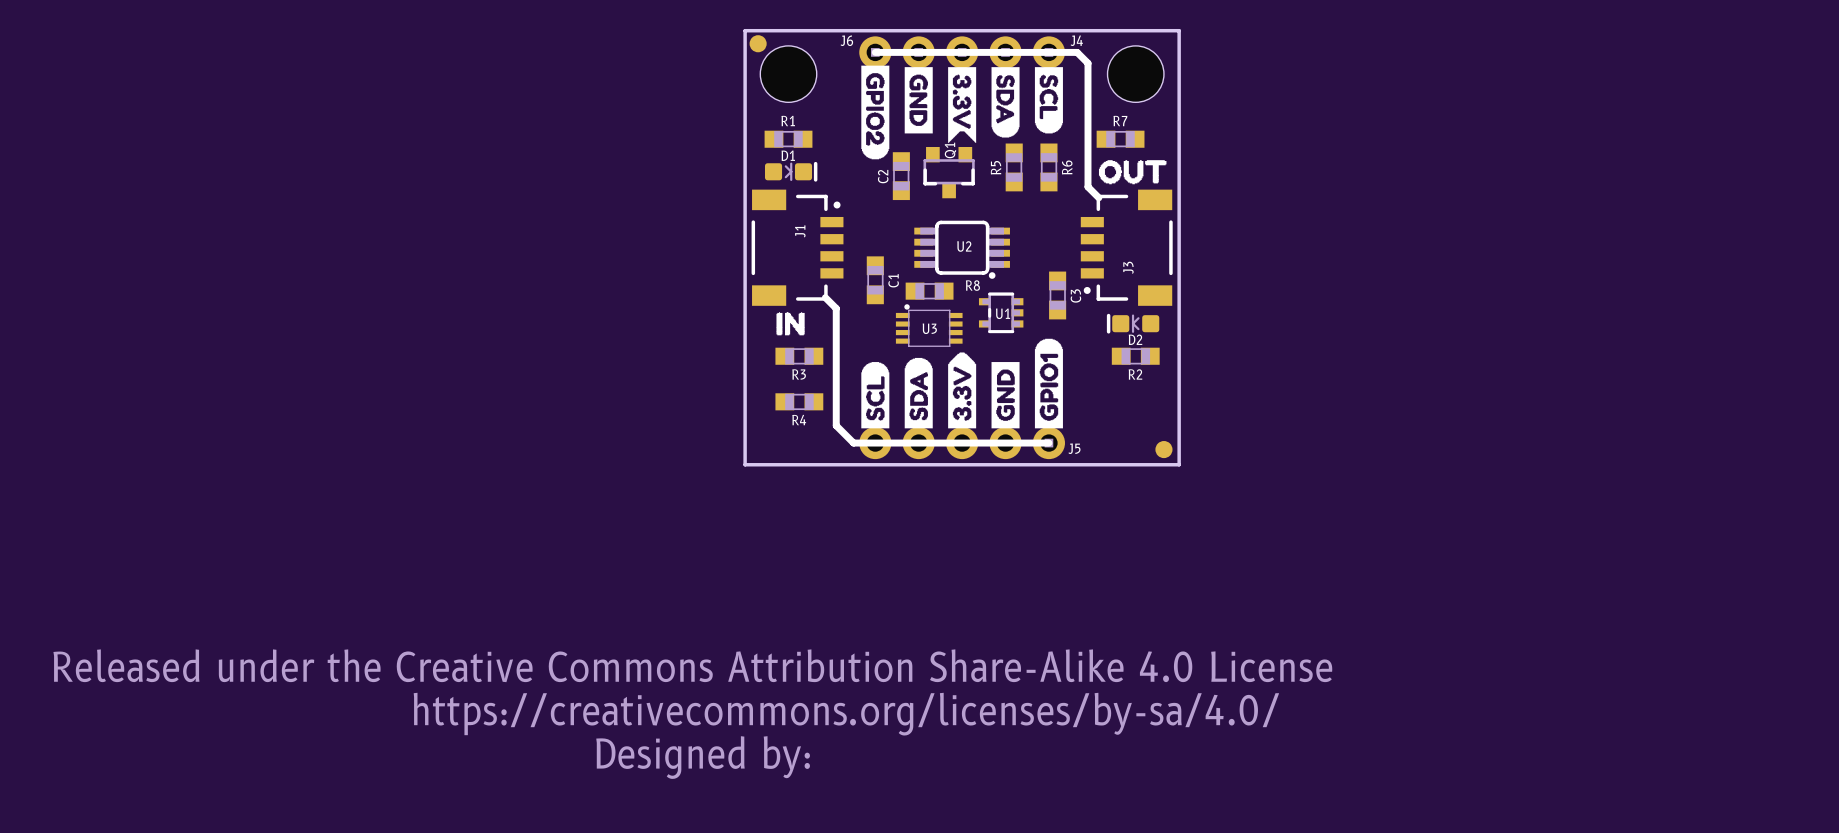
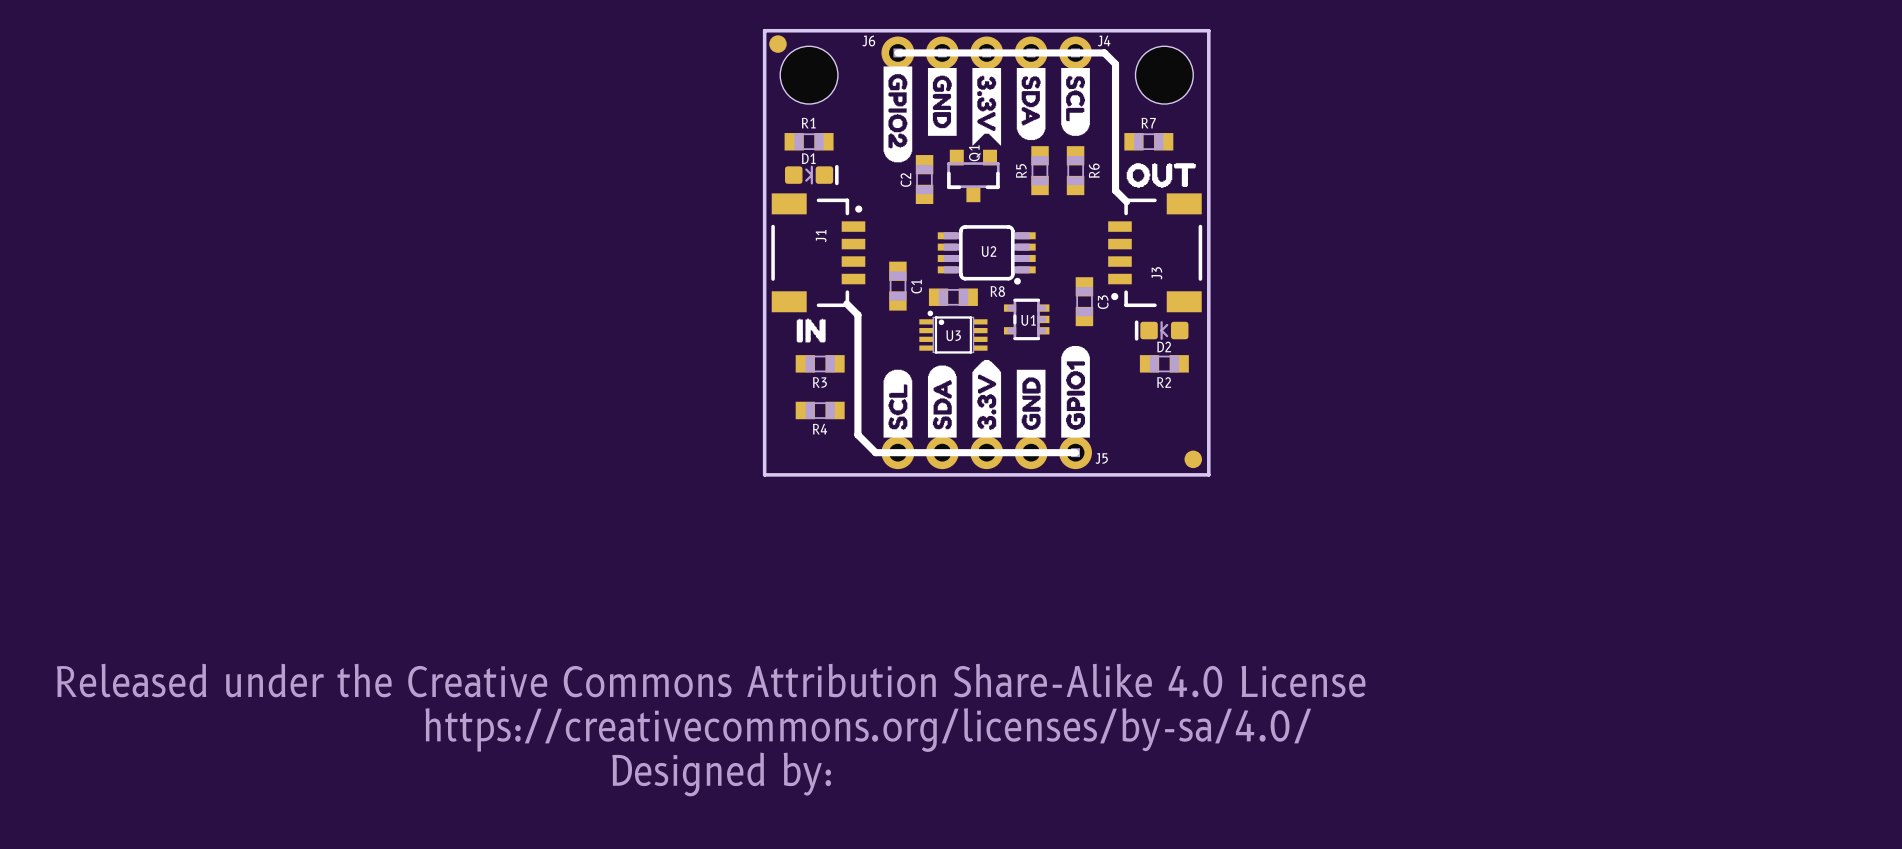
U3 footprint: [895, 304, 963, 347] -> [919, 310, 988, 354]

